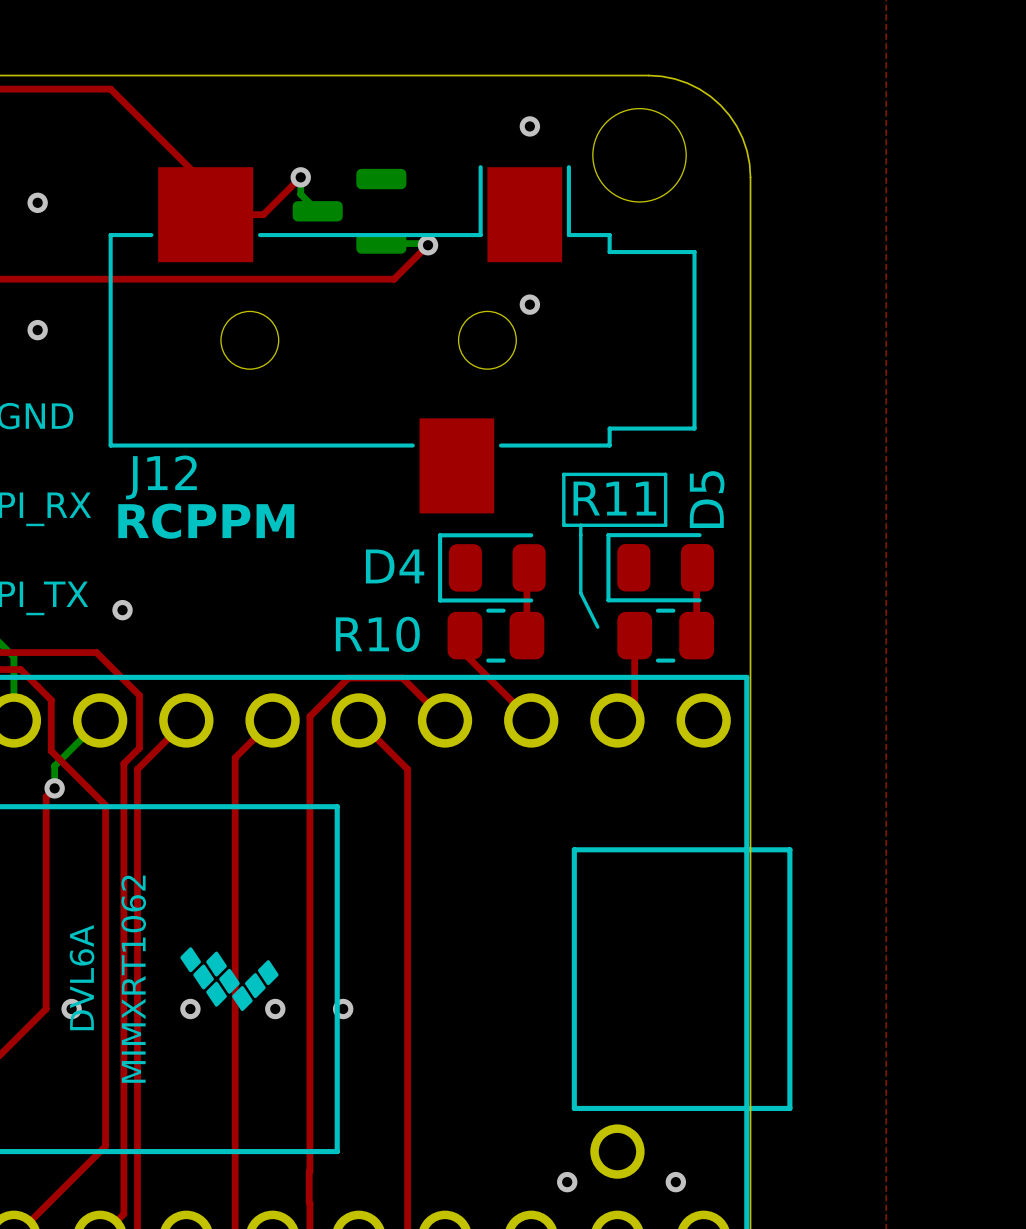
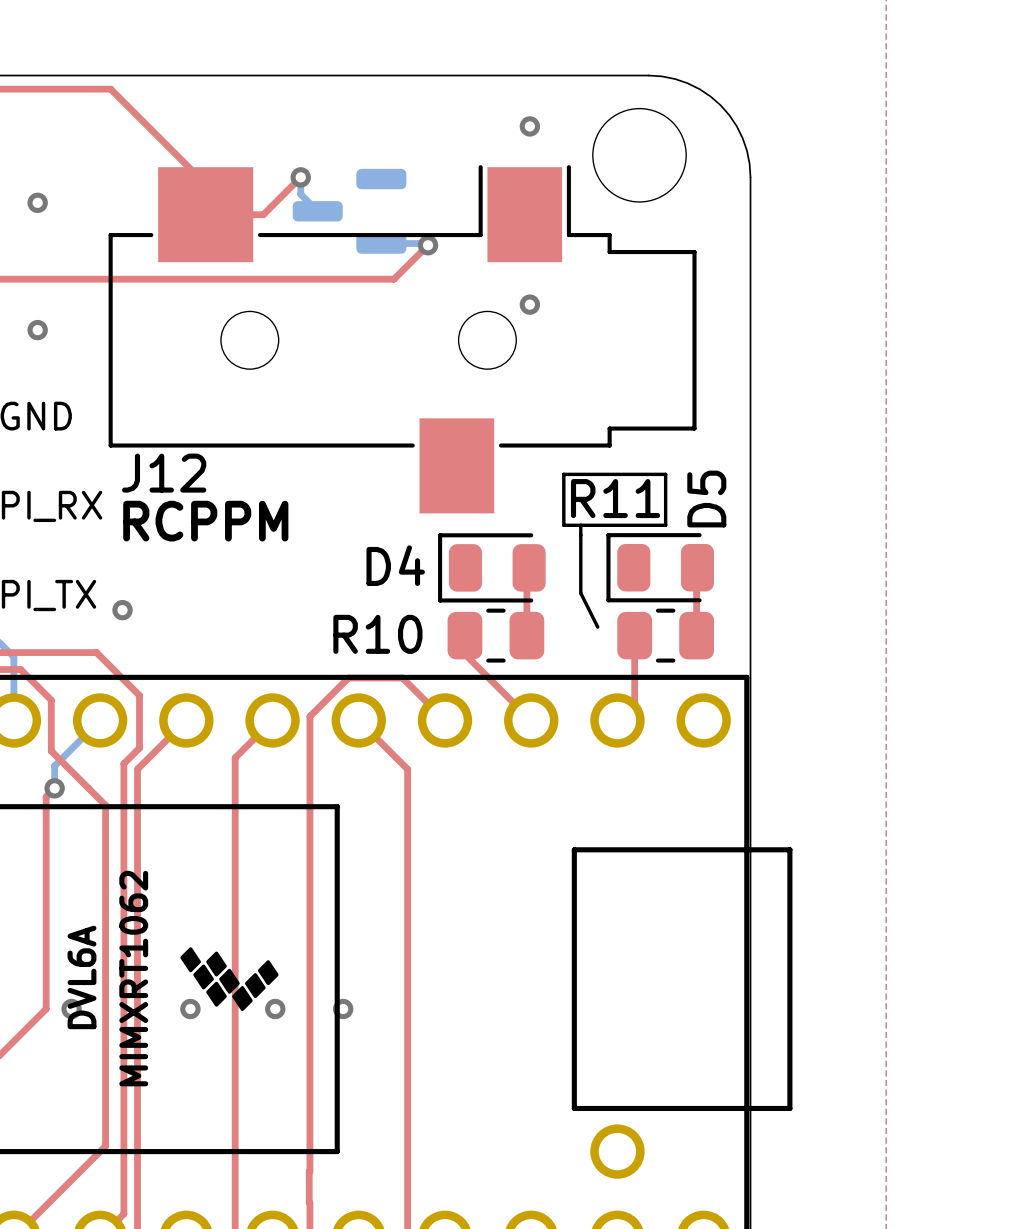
via: (567, 1182) -> none
via: (675, 1182) -> none

